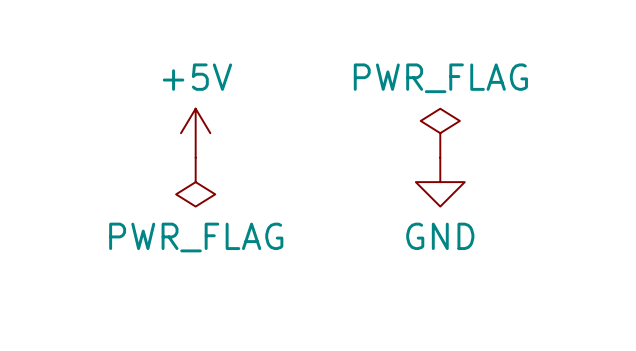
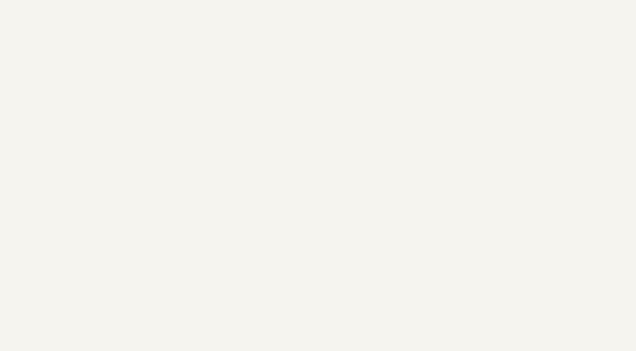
power symbol: +5V (195, 133) -> none
power symbol: PWR_FLAG (440, 133) -> none
power symbol: PWR_FLAG (195, 182) -> none
power symbol: GND (440, 182) -> none

